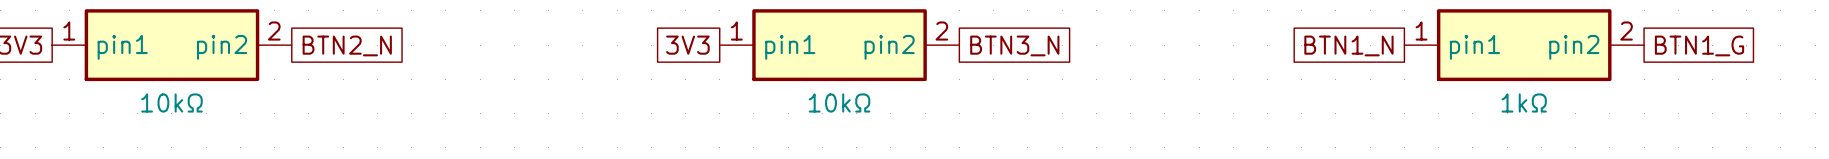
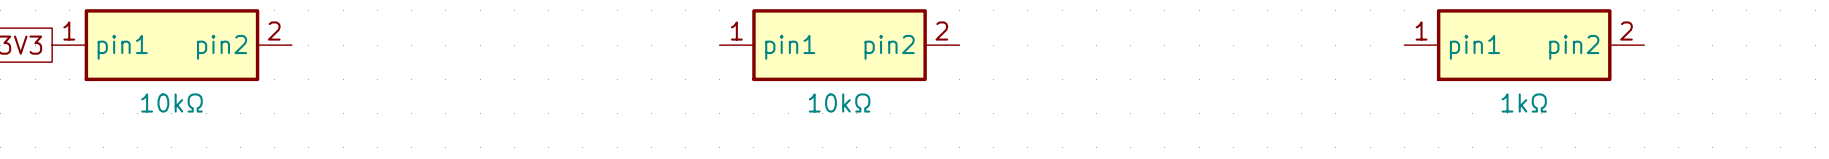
global label: BTN2_N (347, 45) -> none
global label: 3V3 (687, 45) -> none
global label: BTN3_N (1014, 45) -> none
global label: BTN1_N (1348, 45) -> none
global label: BTN1_G (1699, 45) -> none

